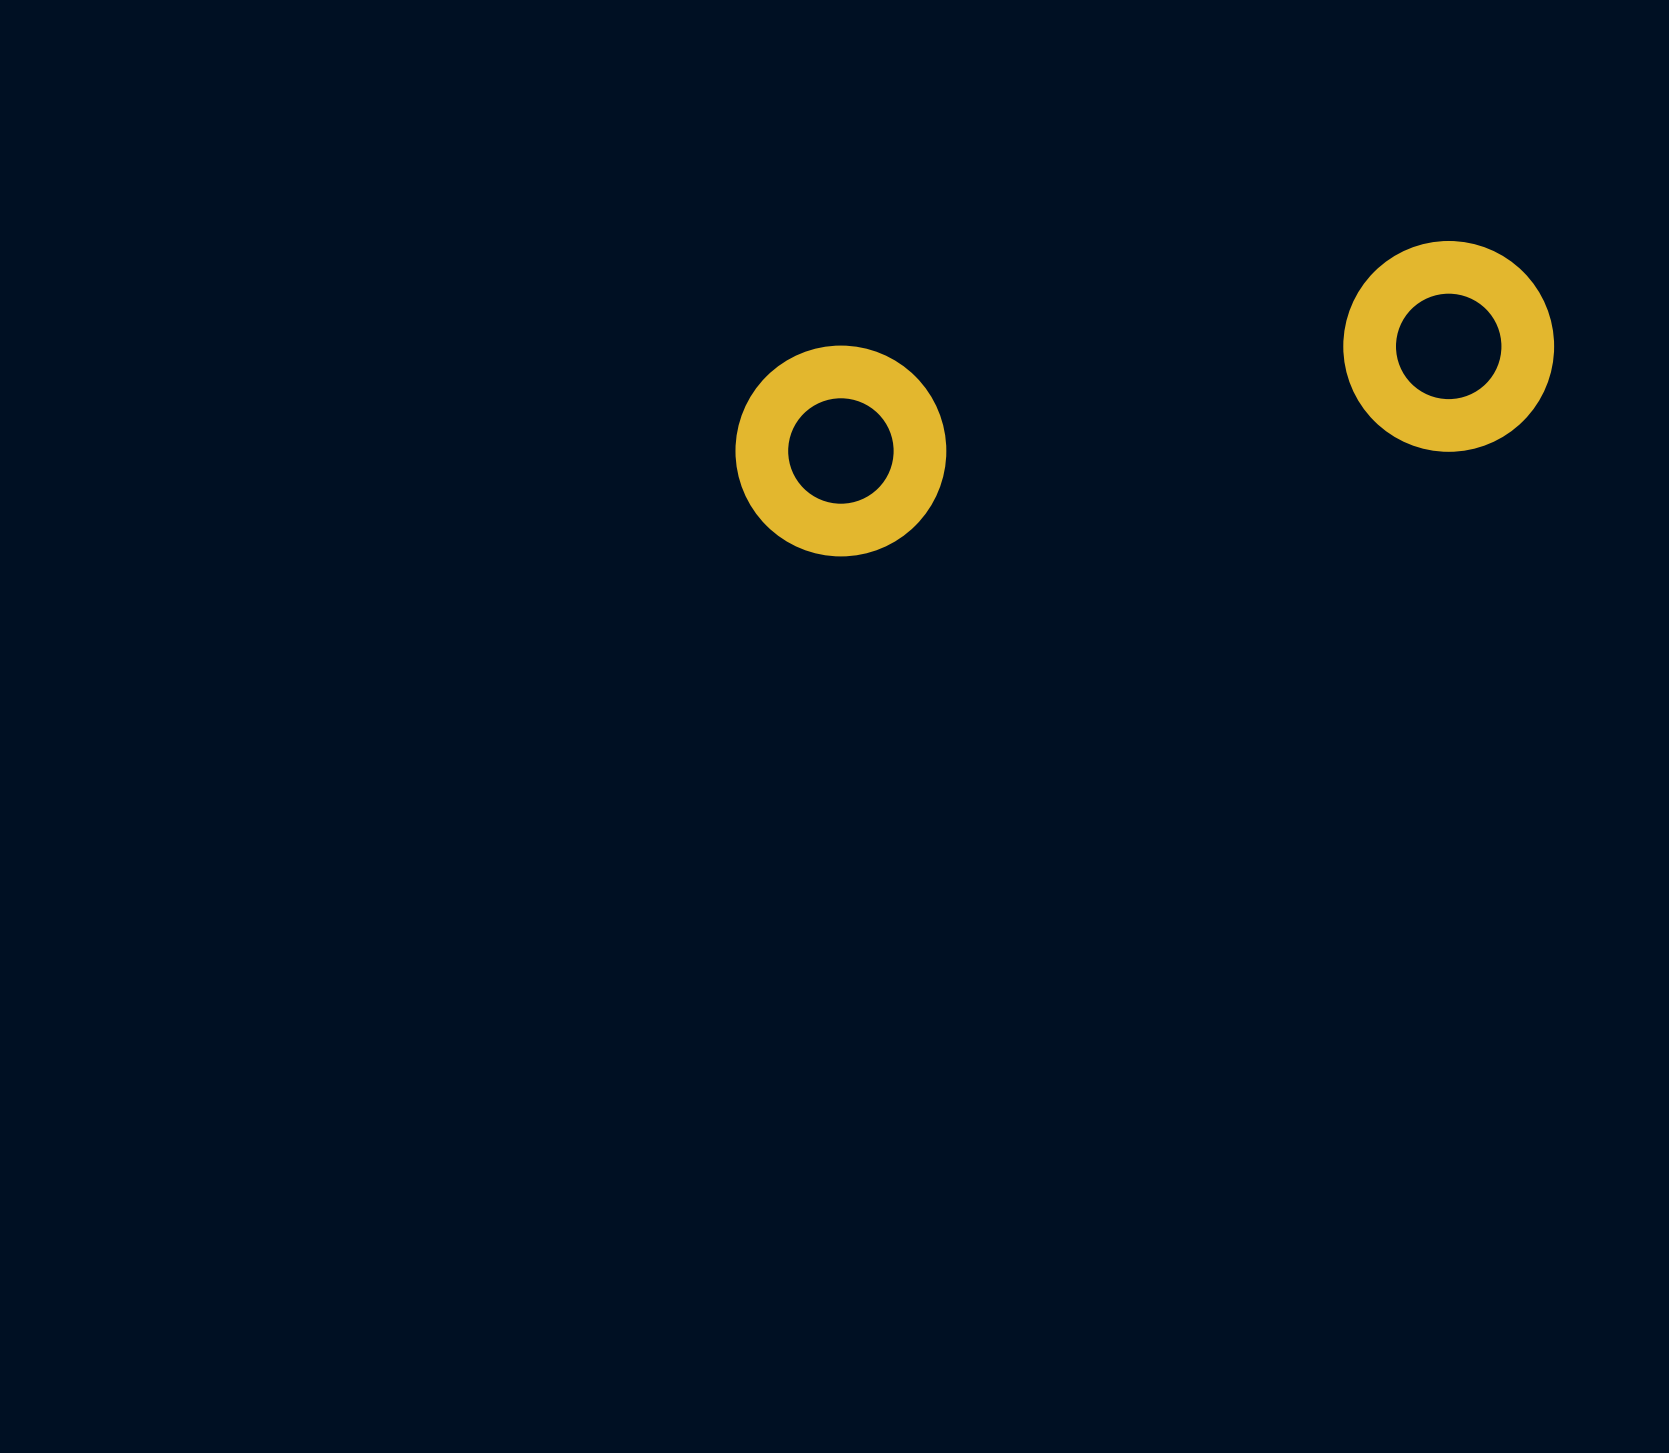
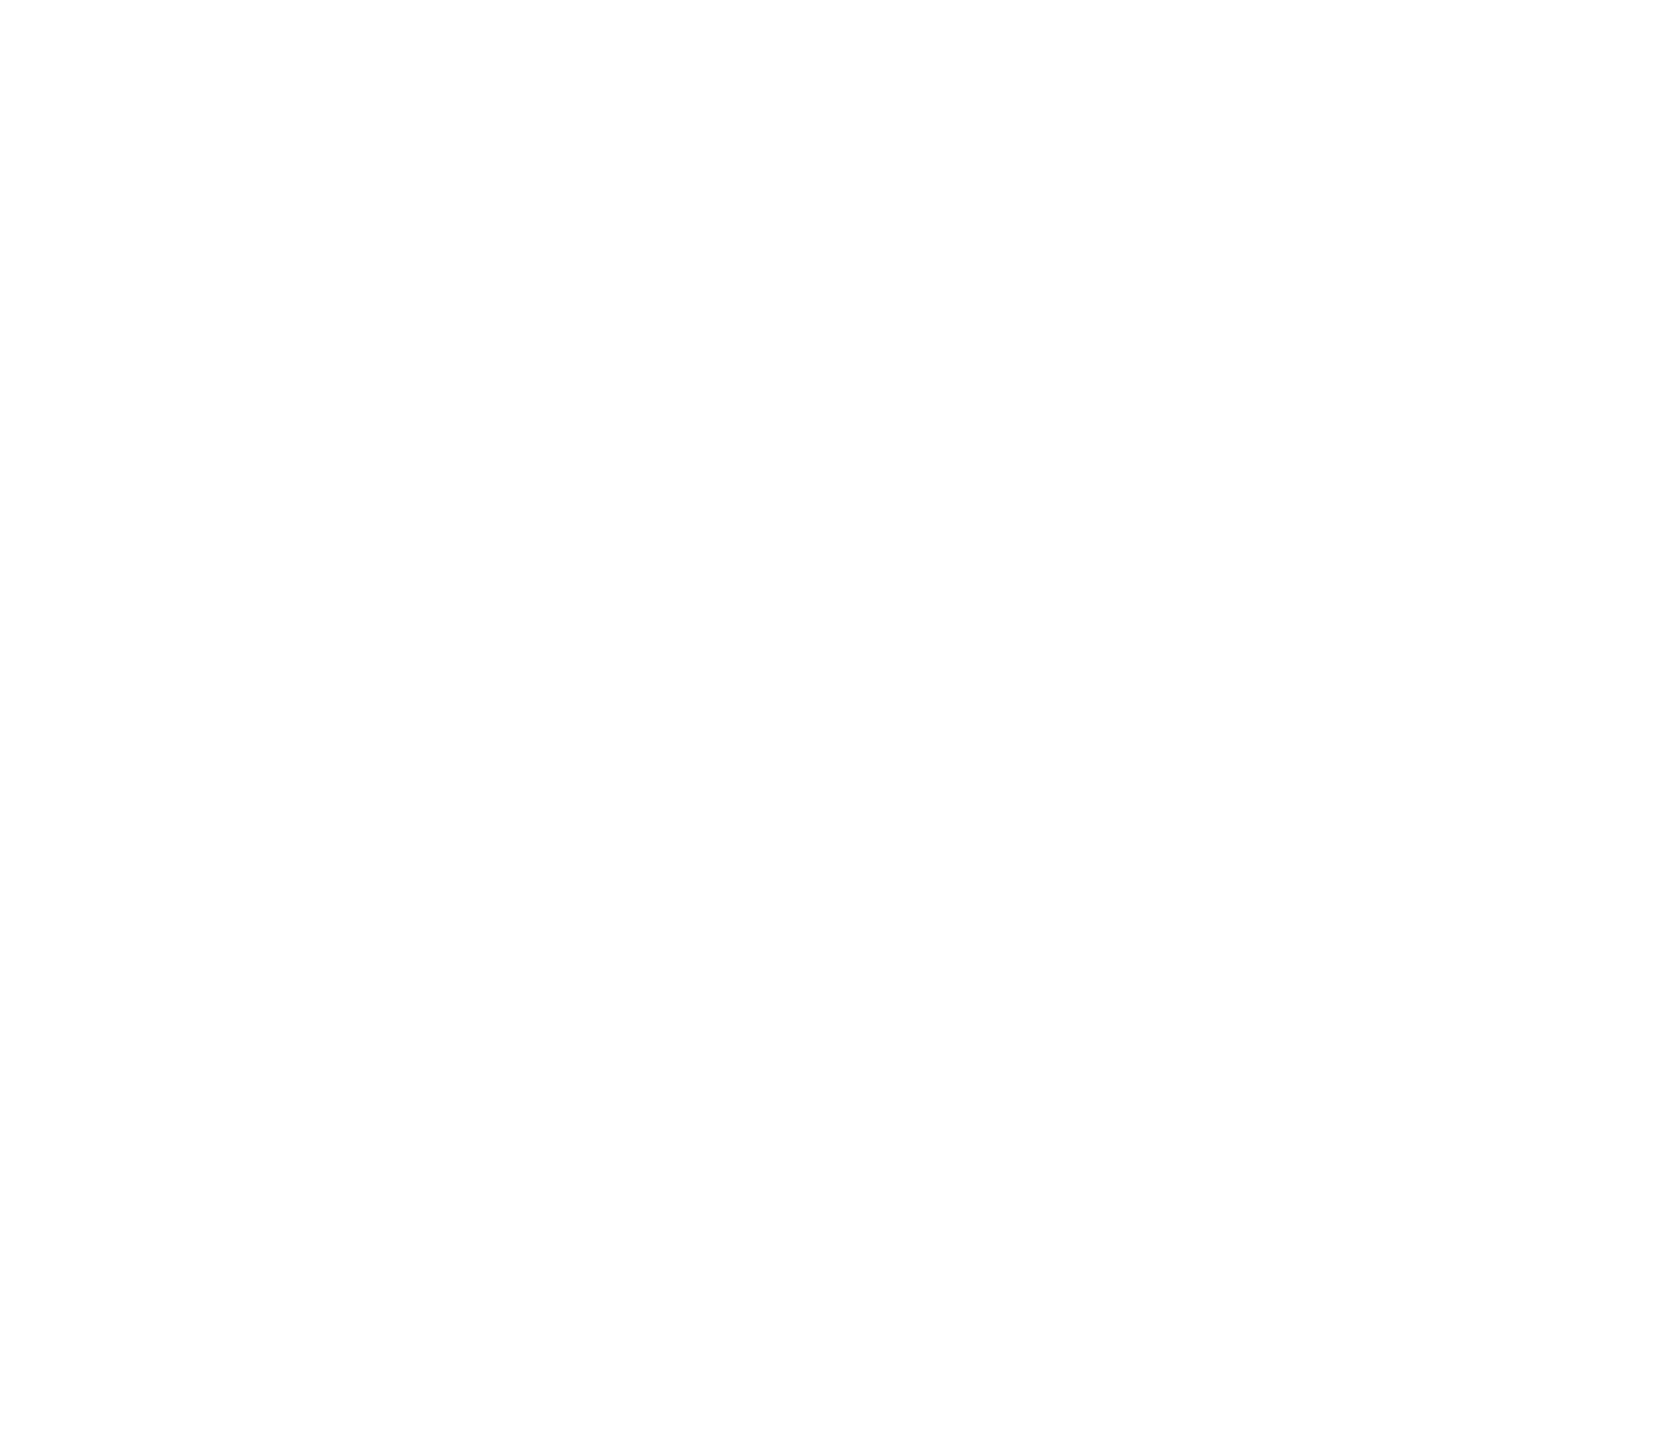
part: (1448, 346) -> none
part: (840, 450) -> none

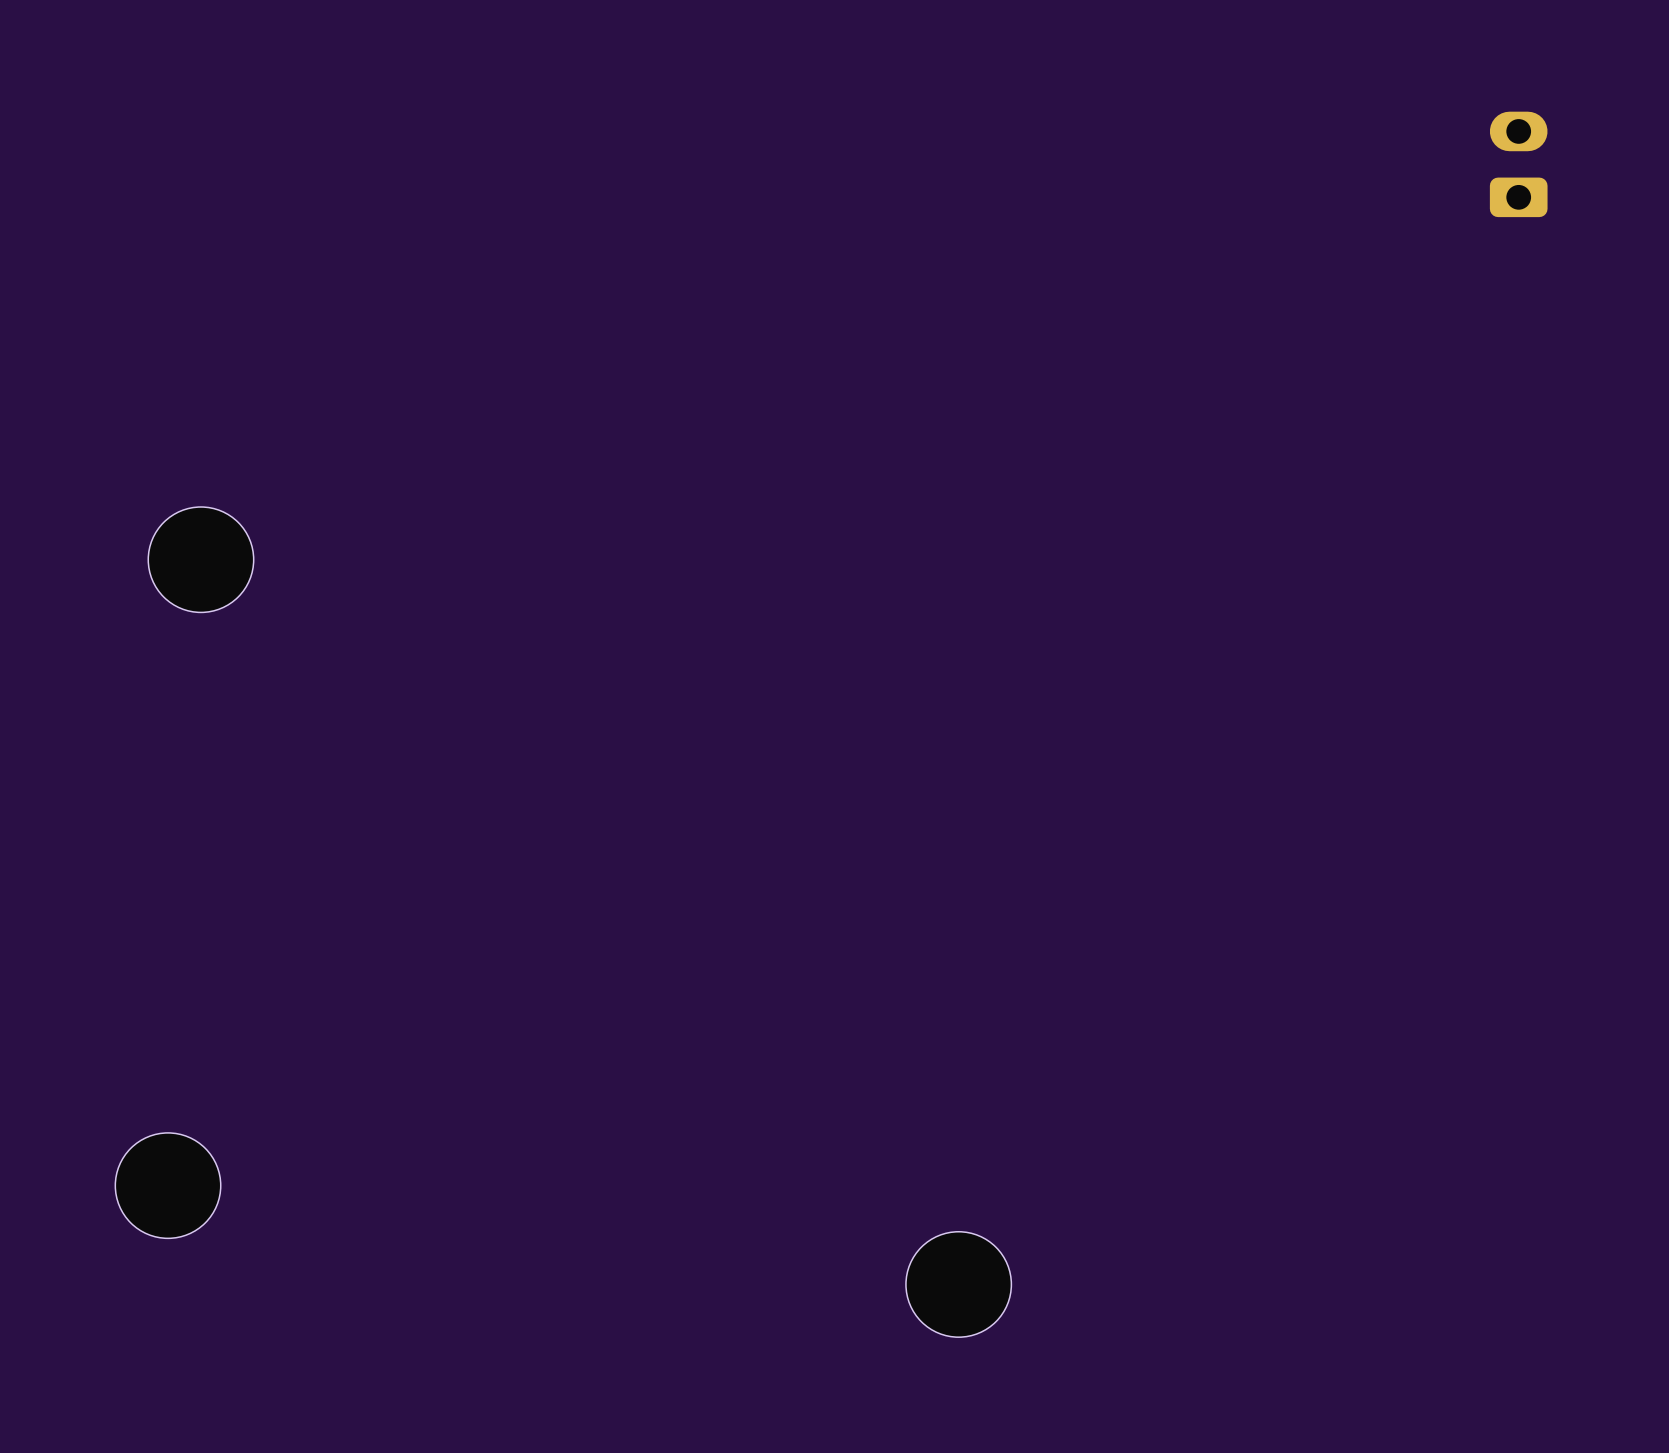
part: none -> (1518, 164)
part: none -> (200, 559)
part: none -> (168, 1185)
part: none -> (958, 1284)

